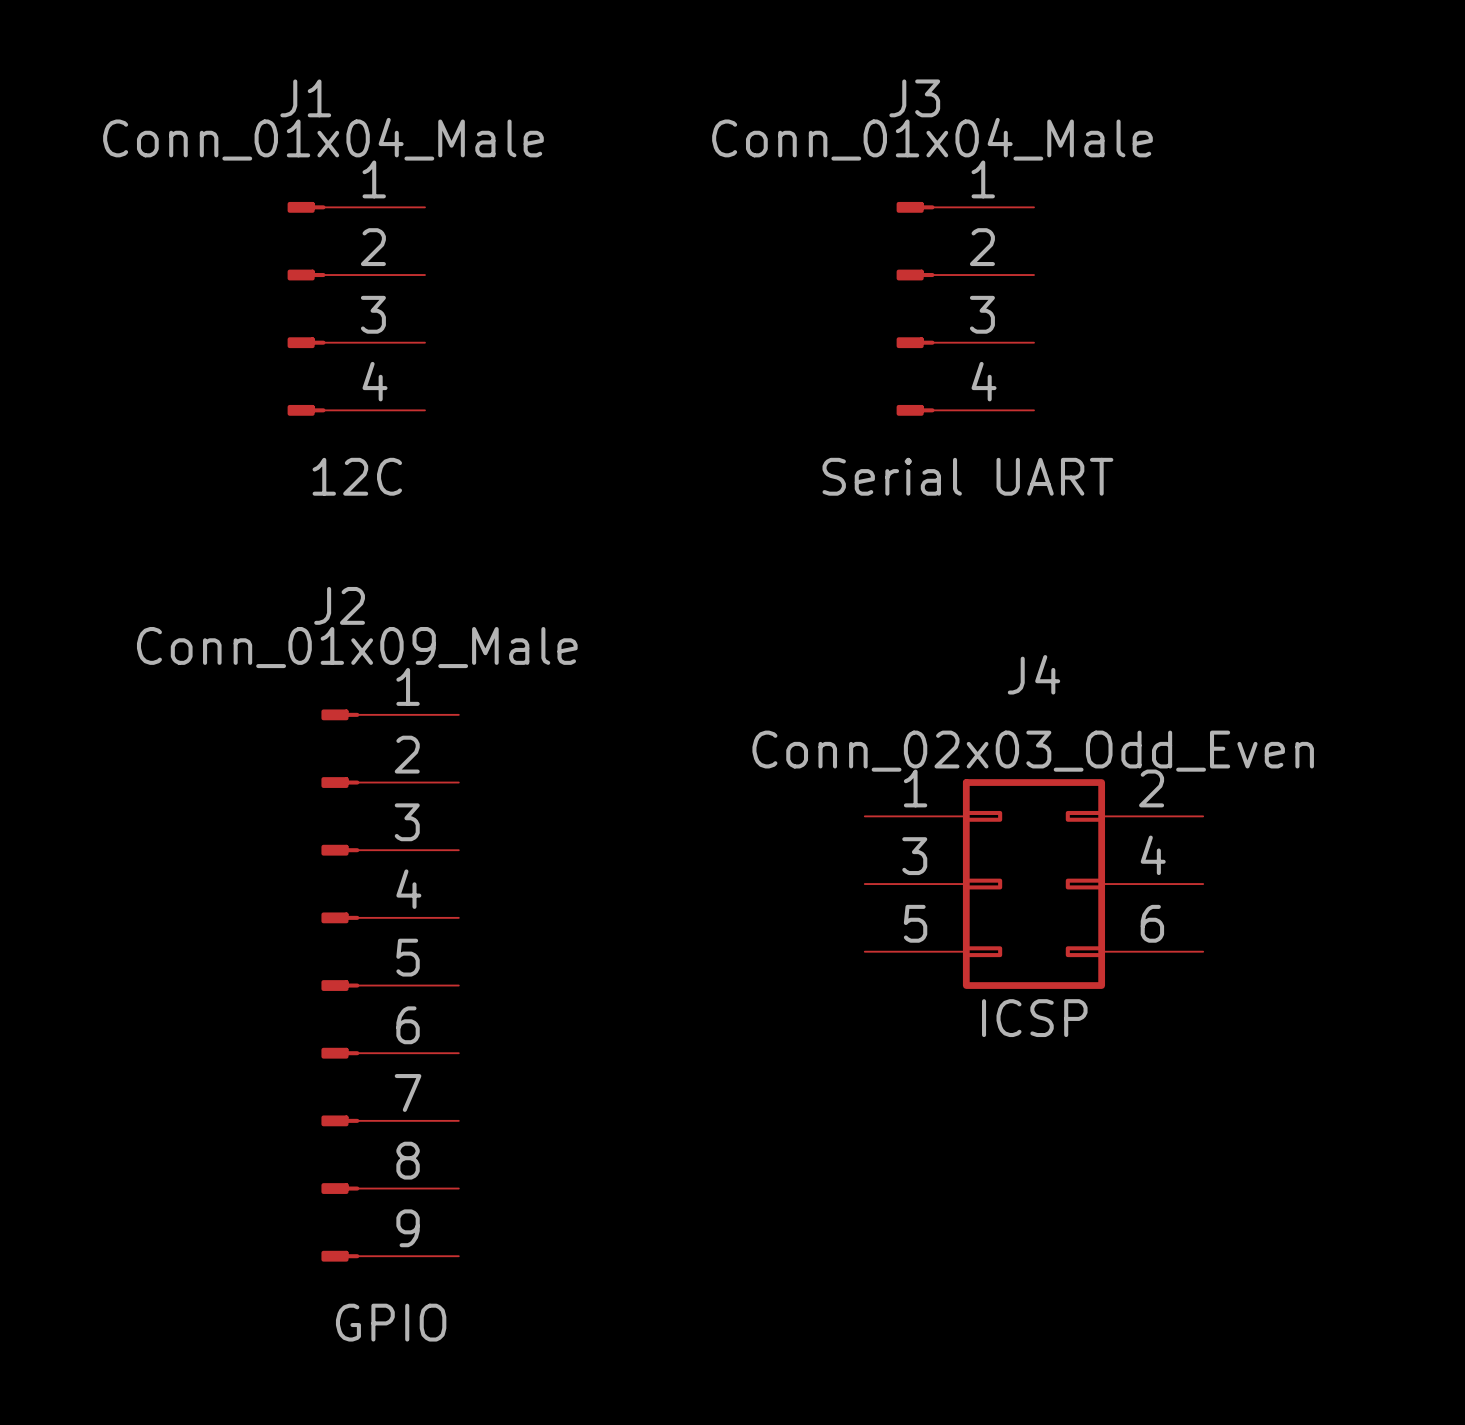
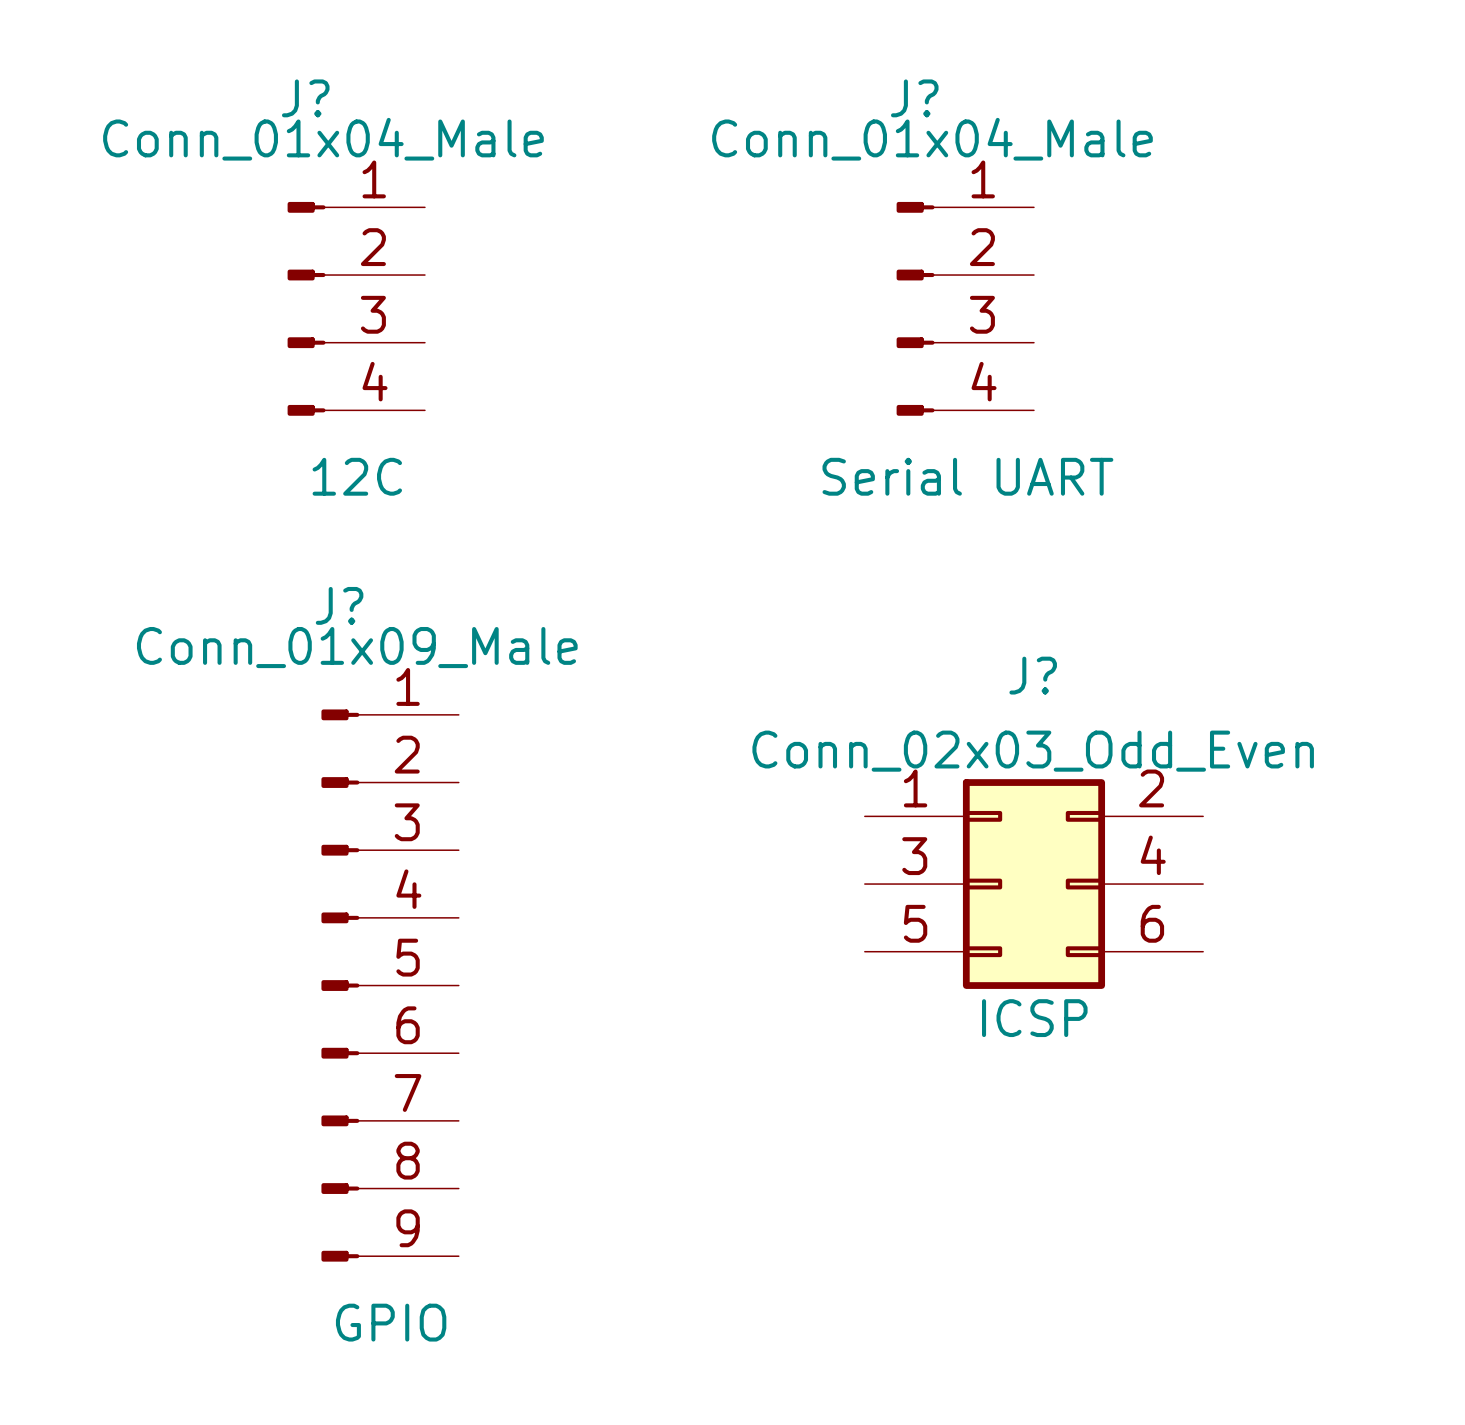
J1 name: J1 (305, 98) -> J? (305, 98)
J3 name: J3 (914, 98) -> J? (914, 98)
J2 name: J2 (339, 605) -> J? (339, 605)
J4 name: J4 (1033, 674) -> J? (1033, 675)

